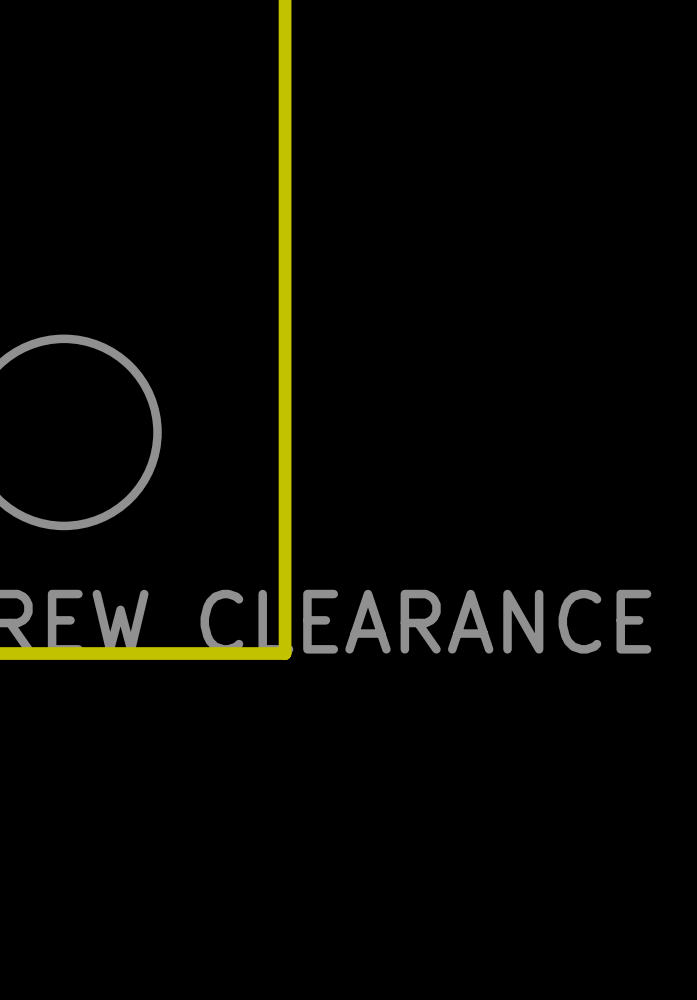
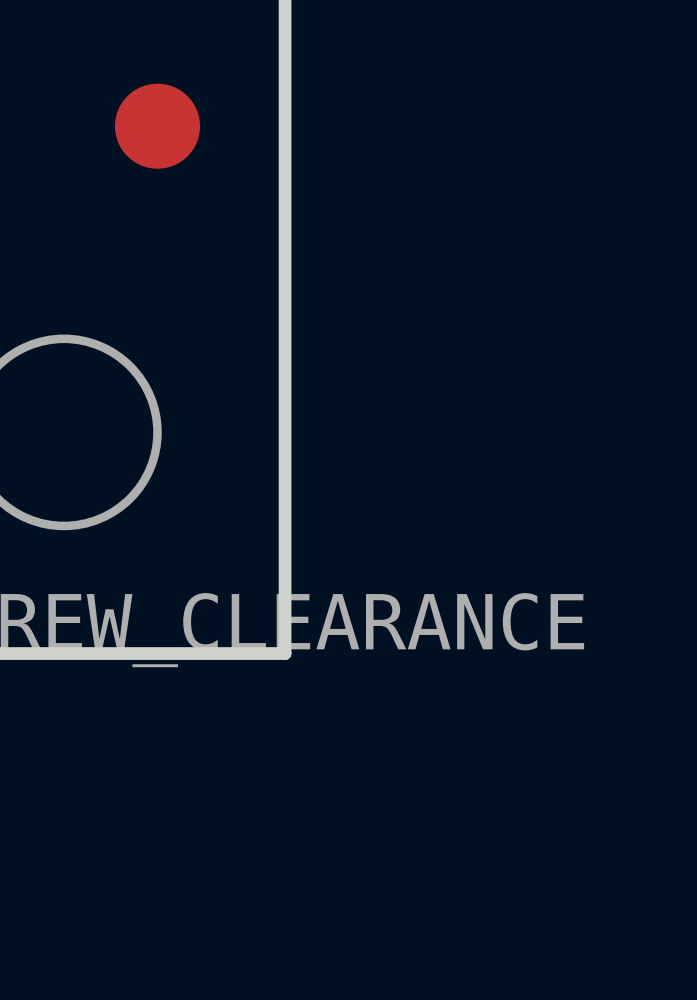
part: none -> (157, 126)

